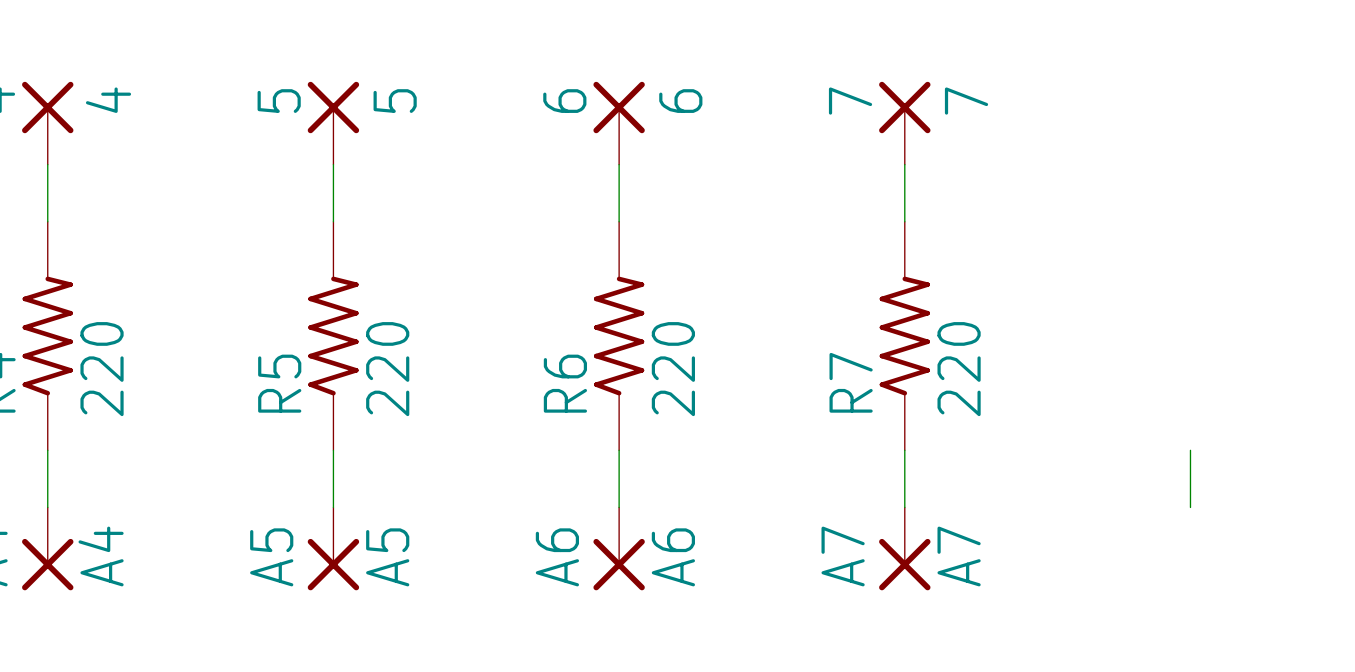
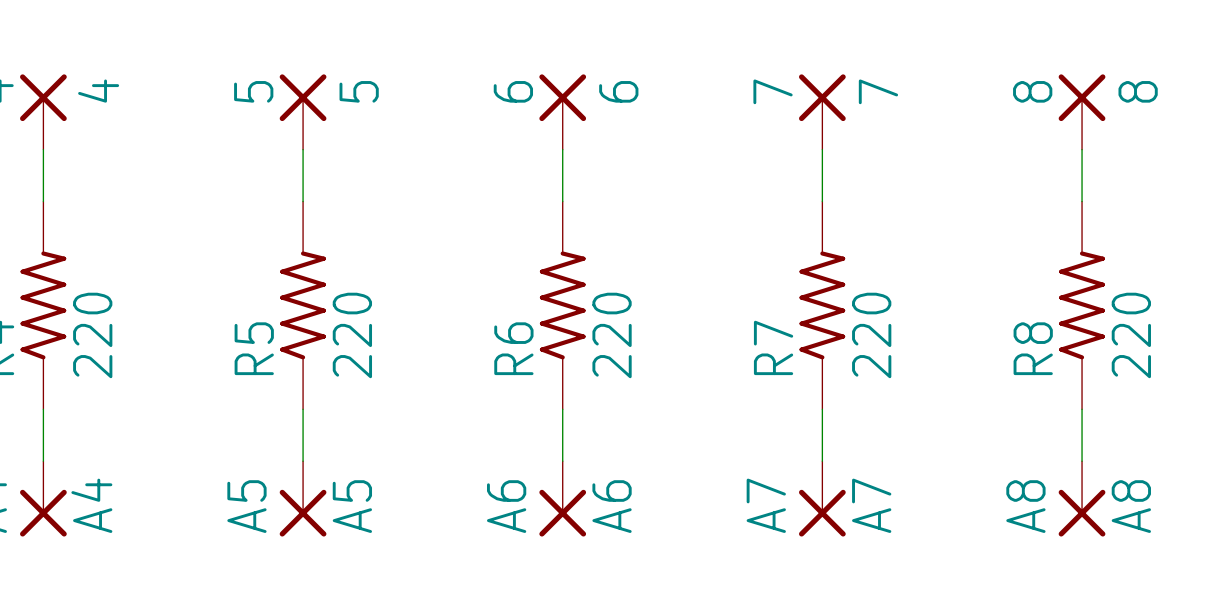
8: none -> 8 (1082, 112)
wire: none -> (1082, 149) (1082, 201)
R8: none -> 220 (1082, 305)
A8: none -> A8 (1082, 498)

